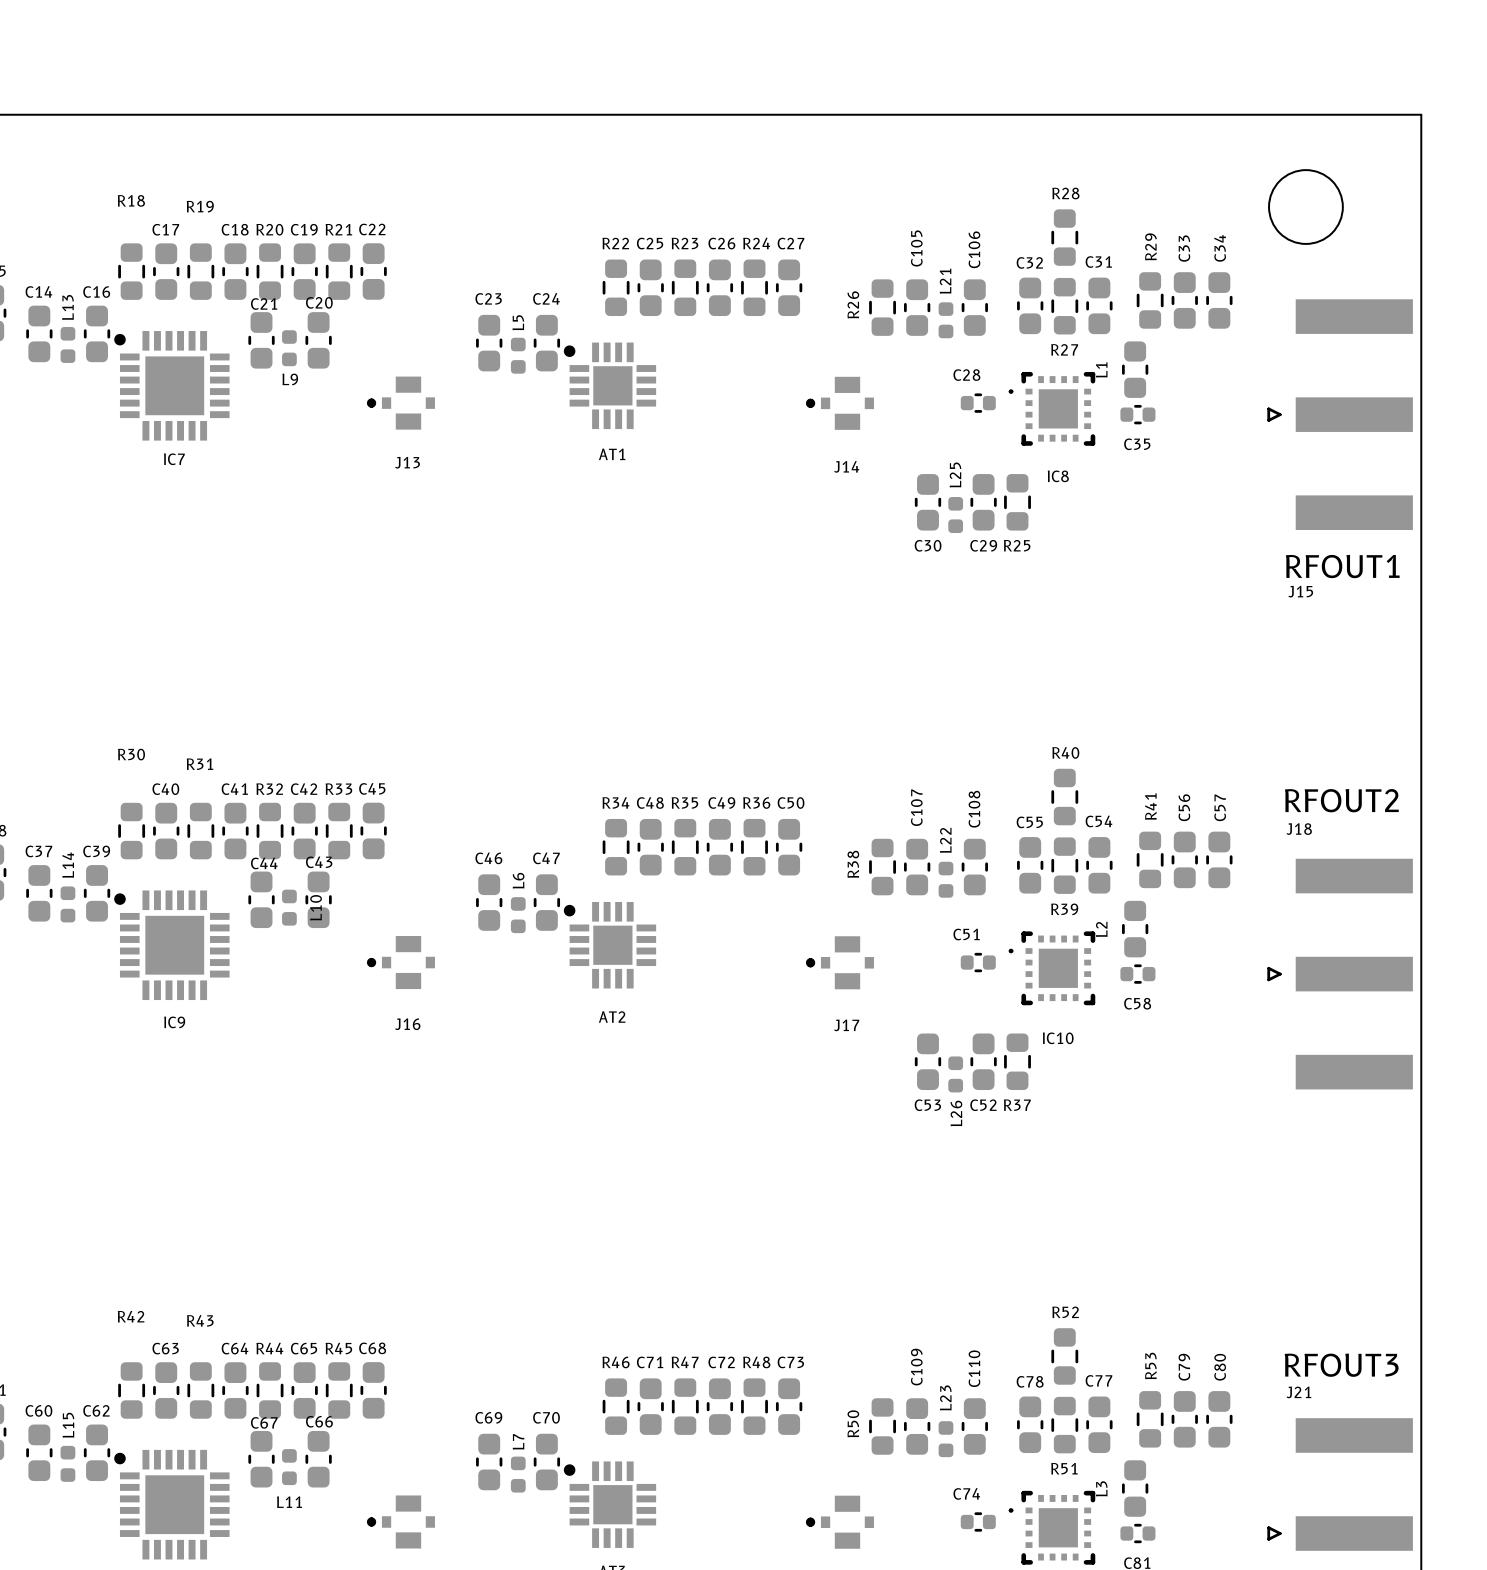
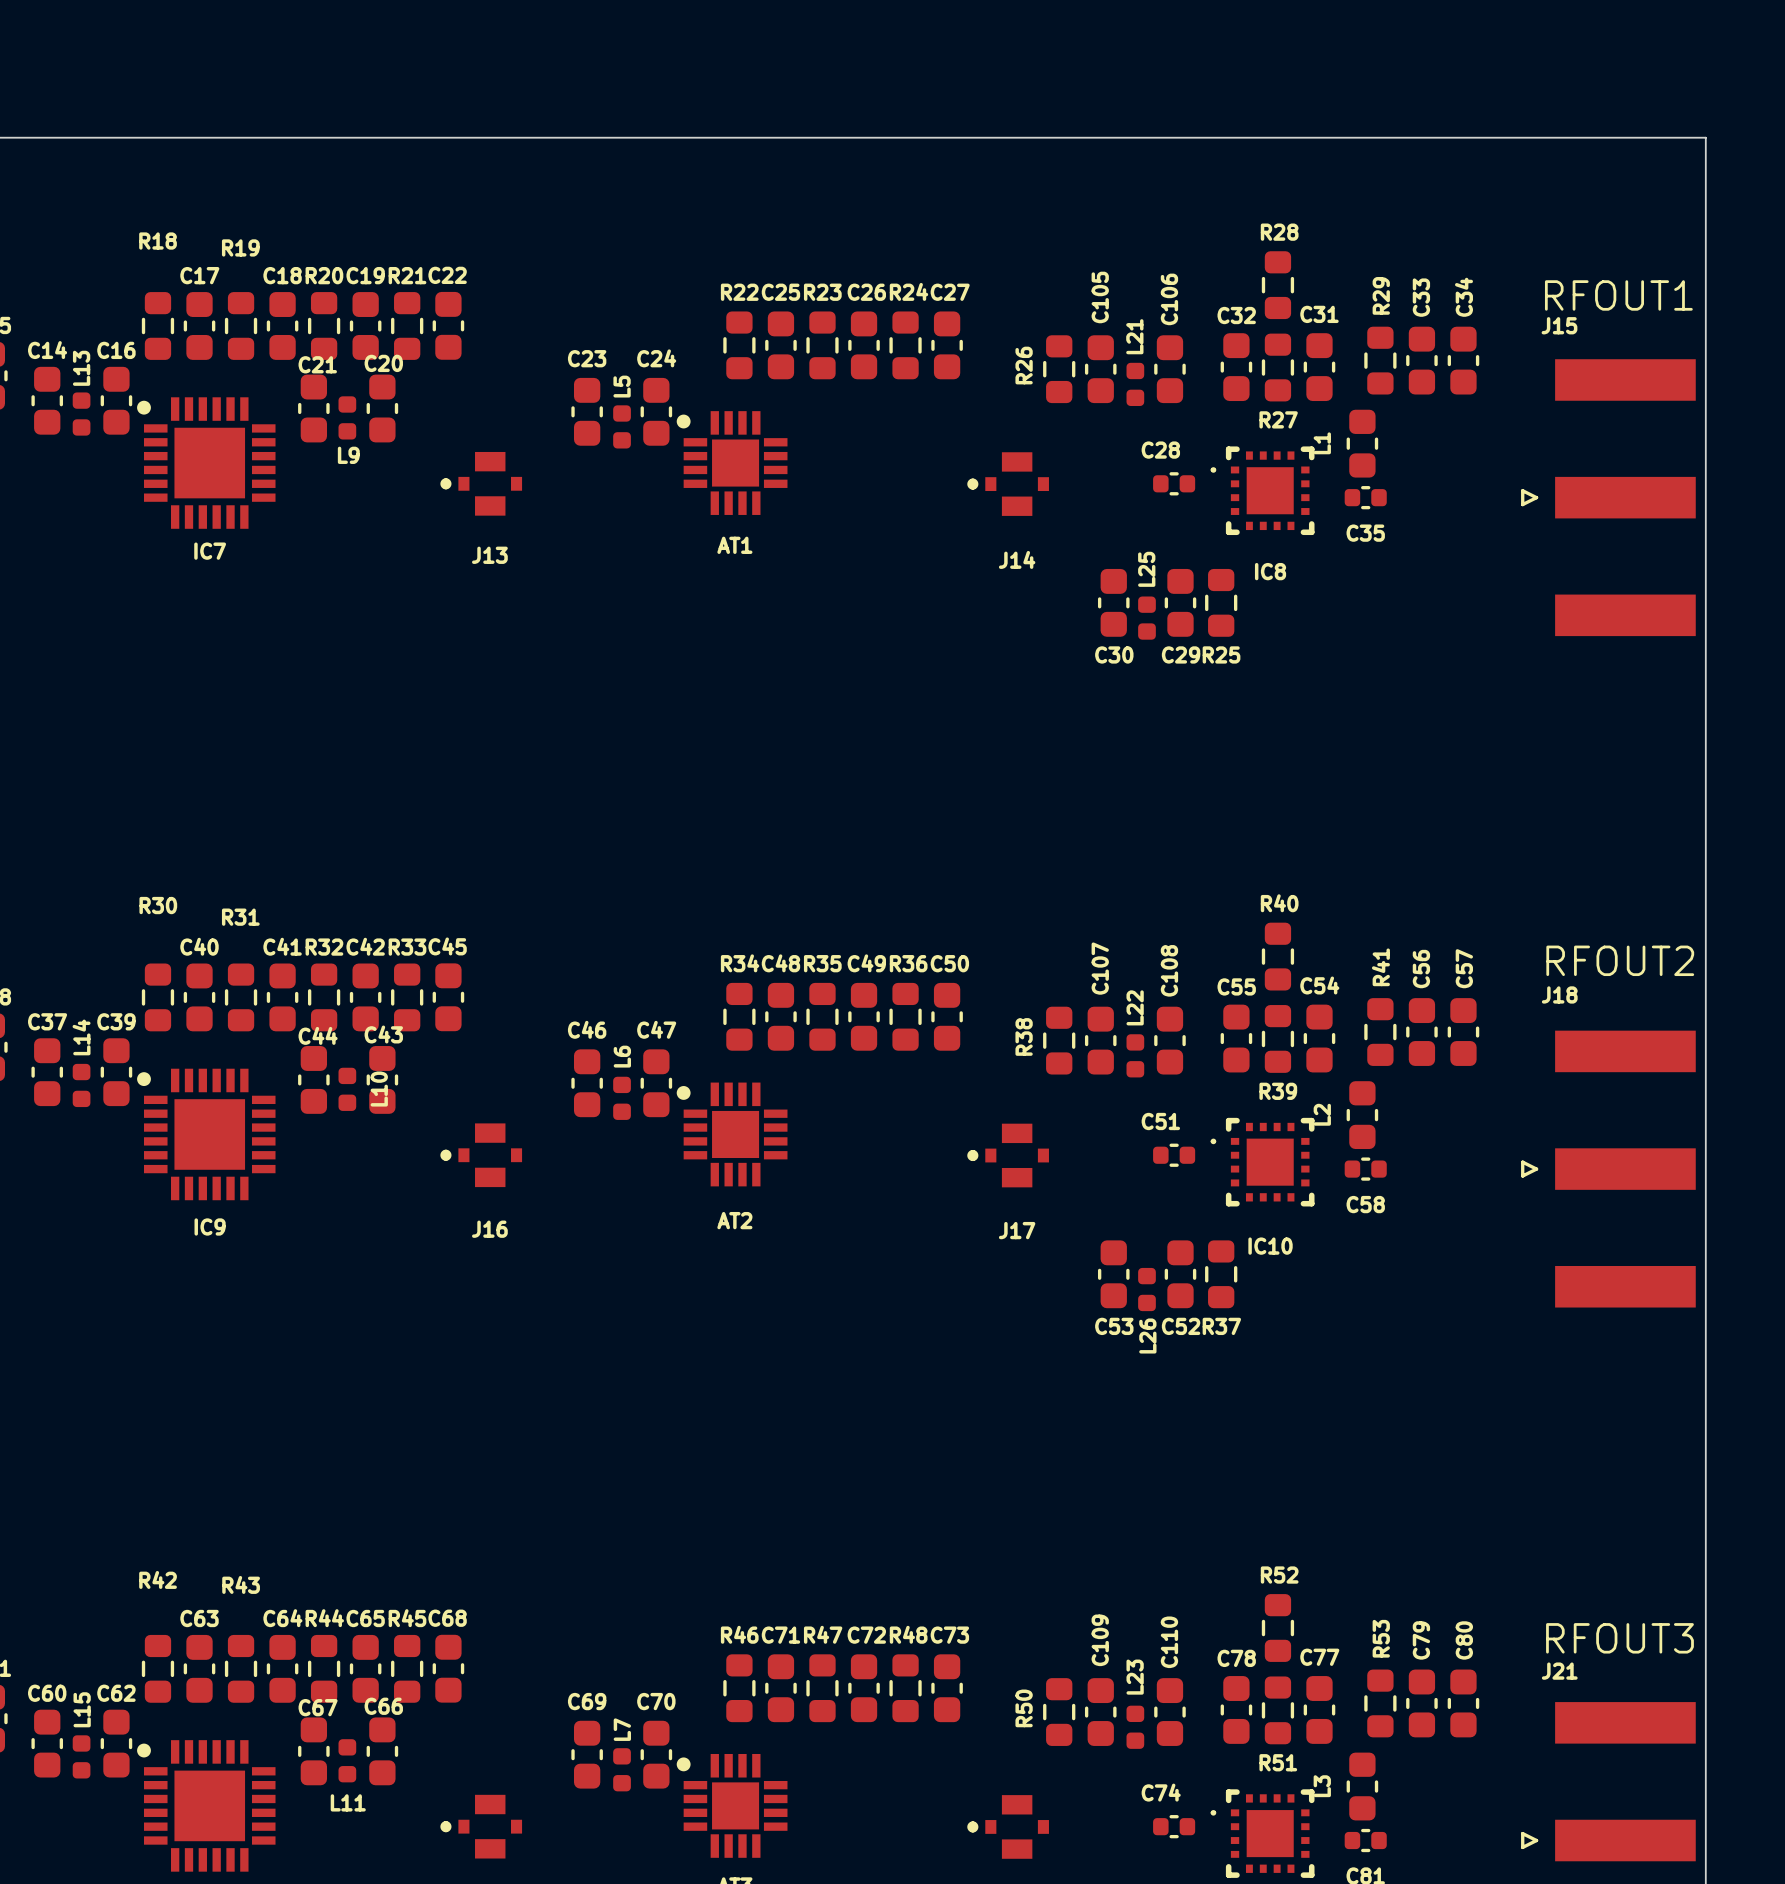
round board edge: [1268, 169, 1344, 245] -> none
text position: RFOUT1 (1342, 566) -> RFOUT1 (1618, 295)
J15 name position: J15 (1300, 591) -> J15 (1559, 325)

